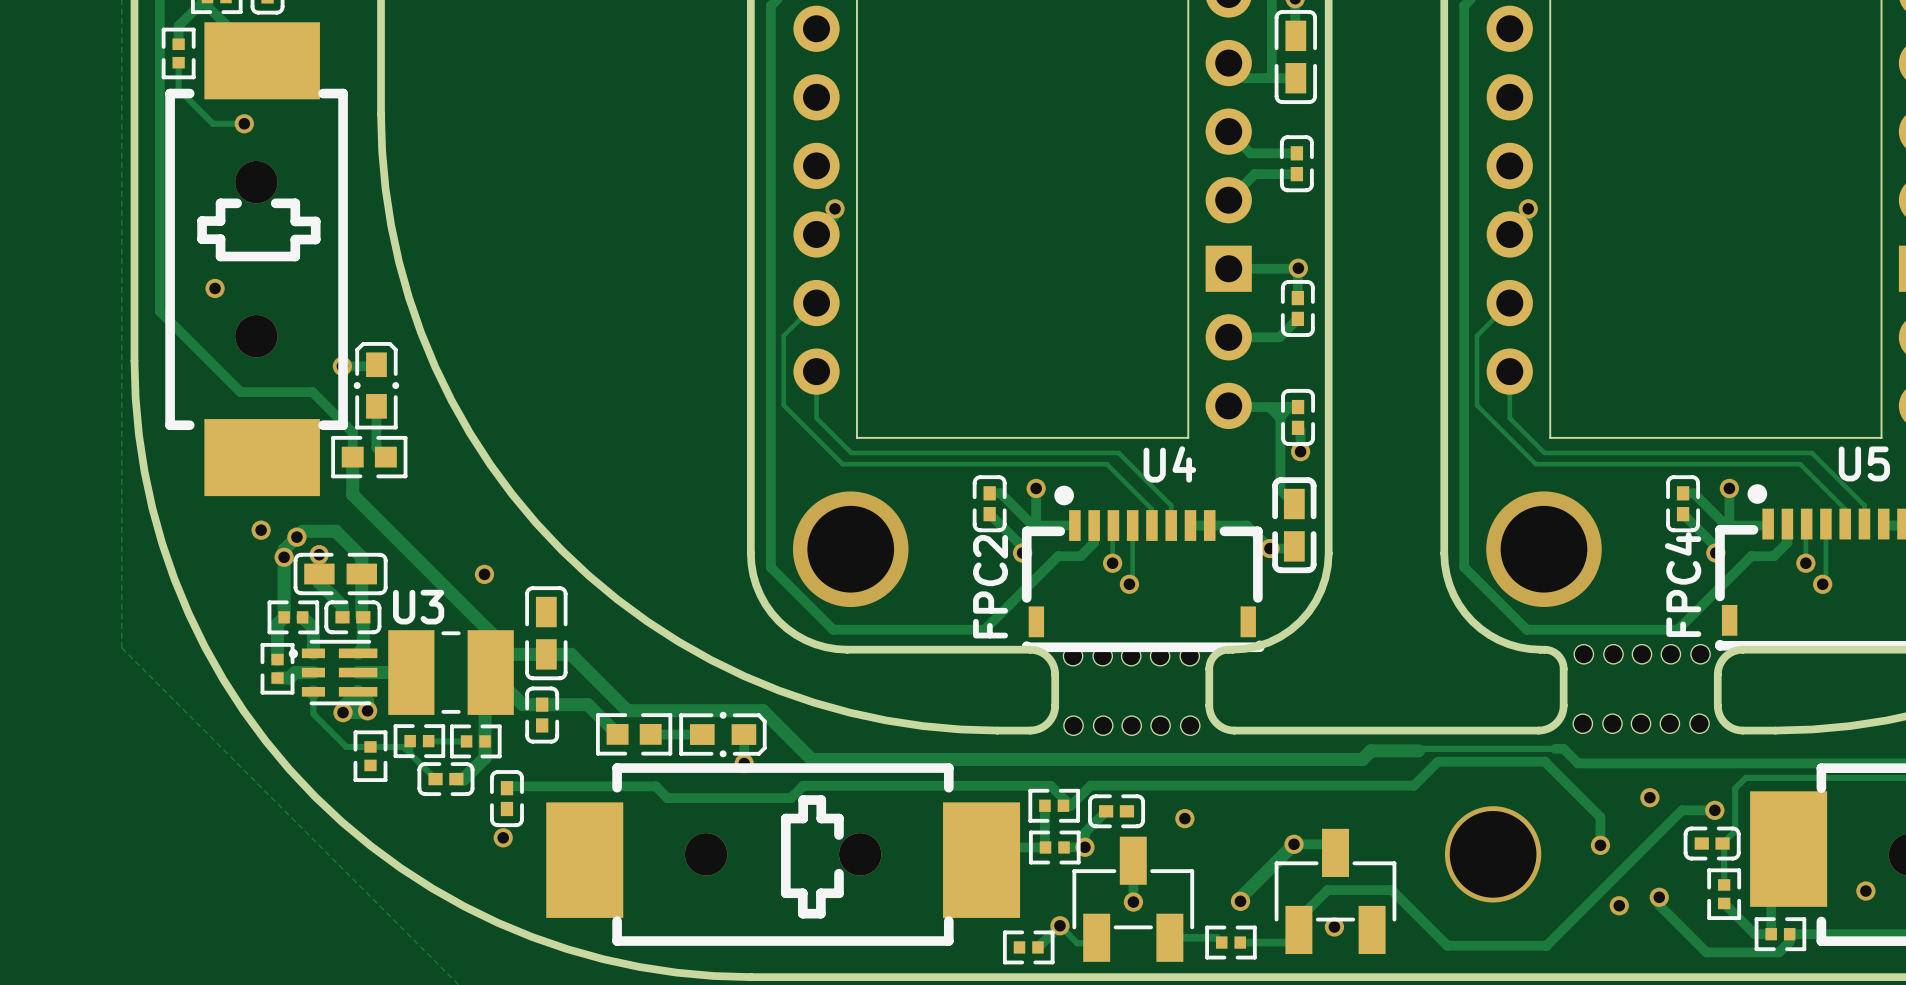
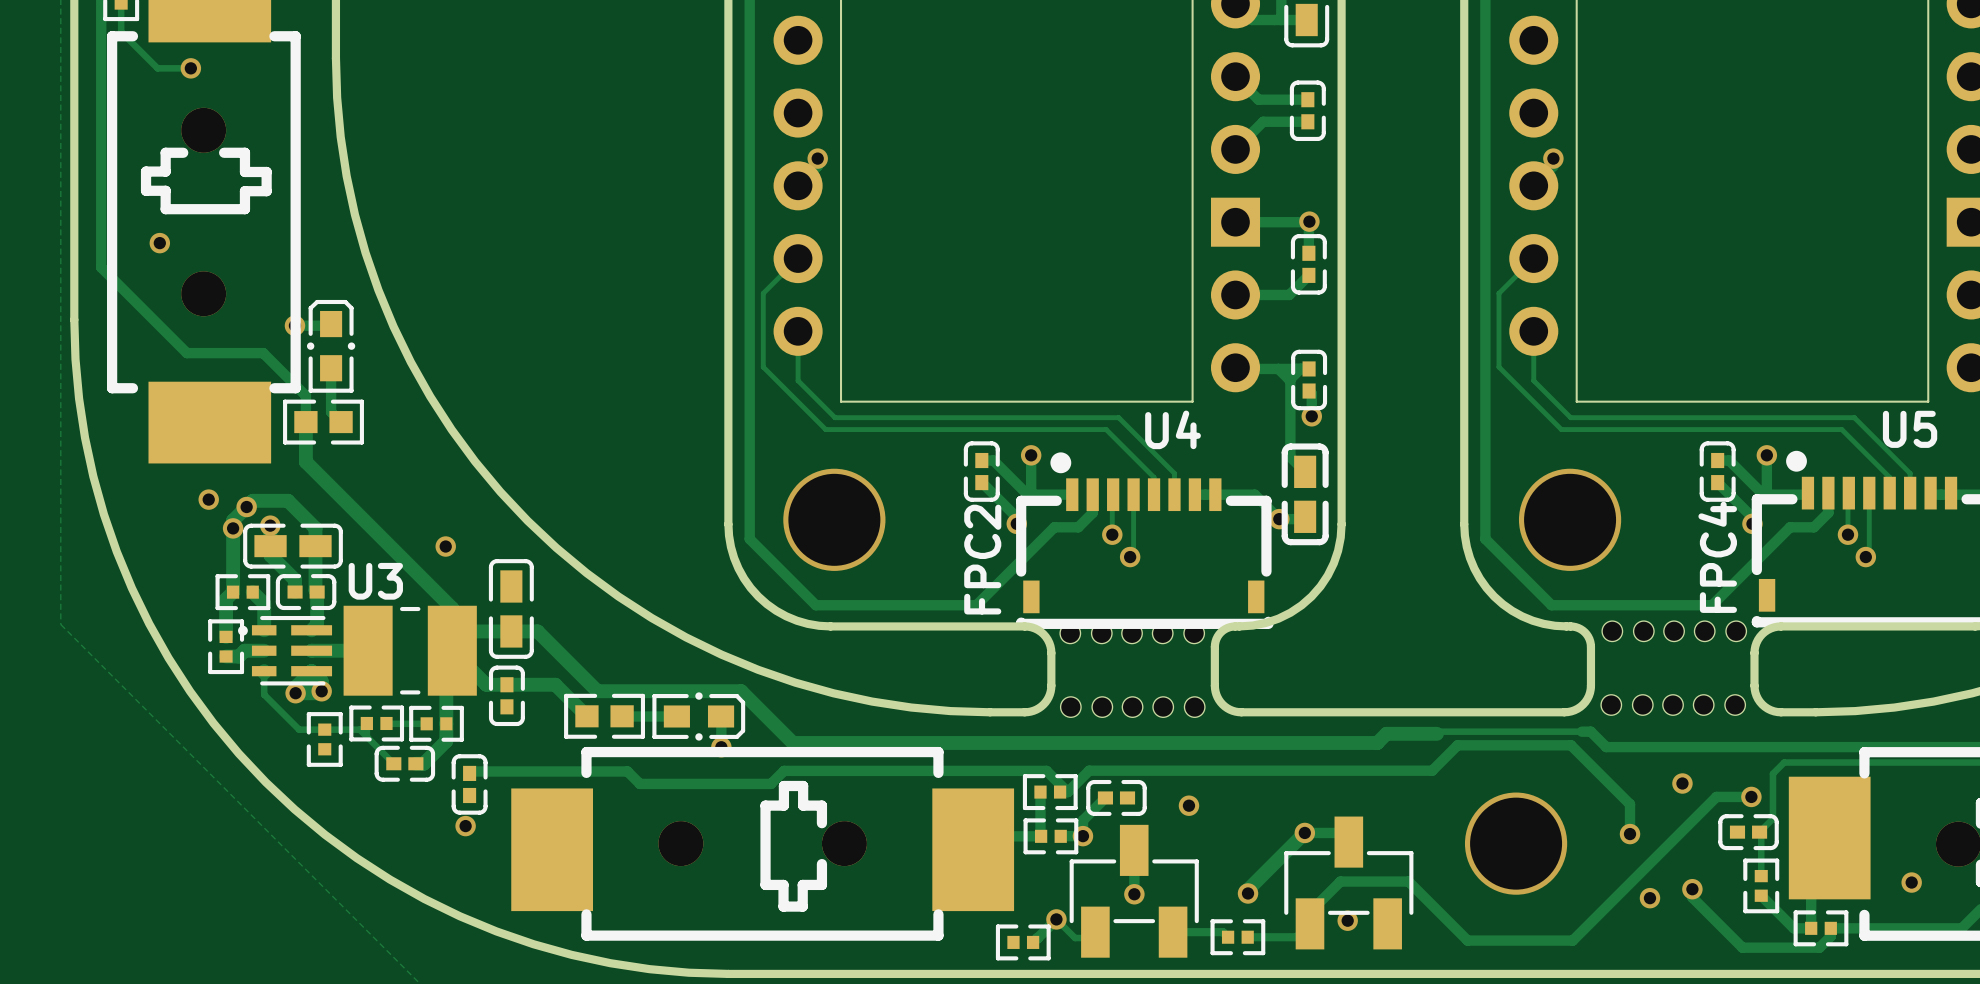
via size: [792, 491, 909, 608] -> [783, 468, 886, 571]
via size: [1486, 491, 1602, 608] -> [1518, 468, 1622, 571]

